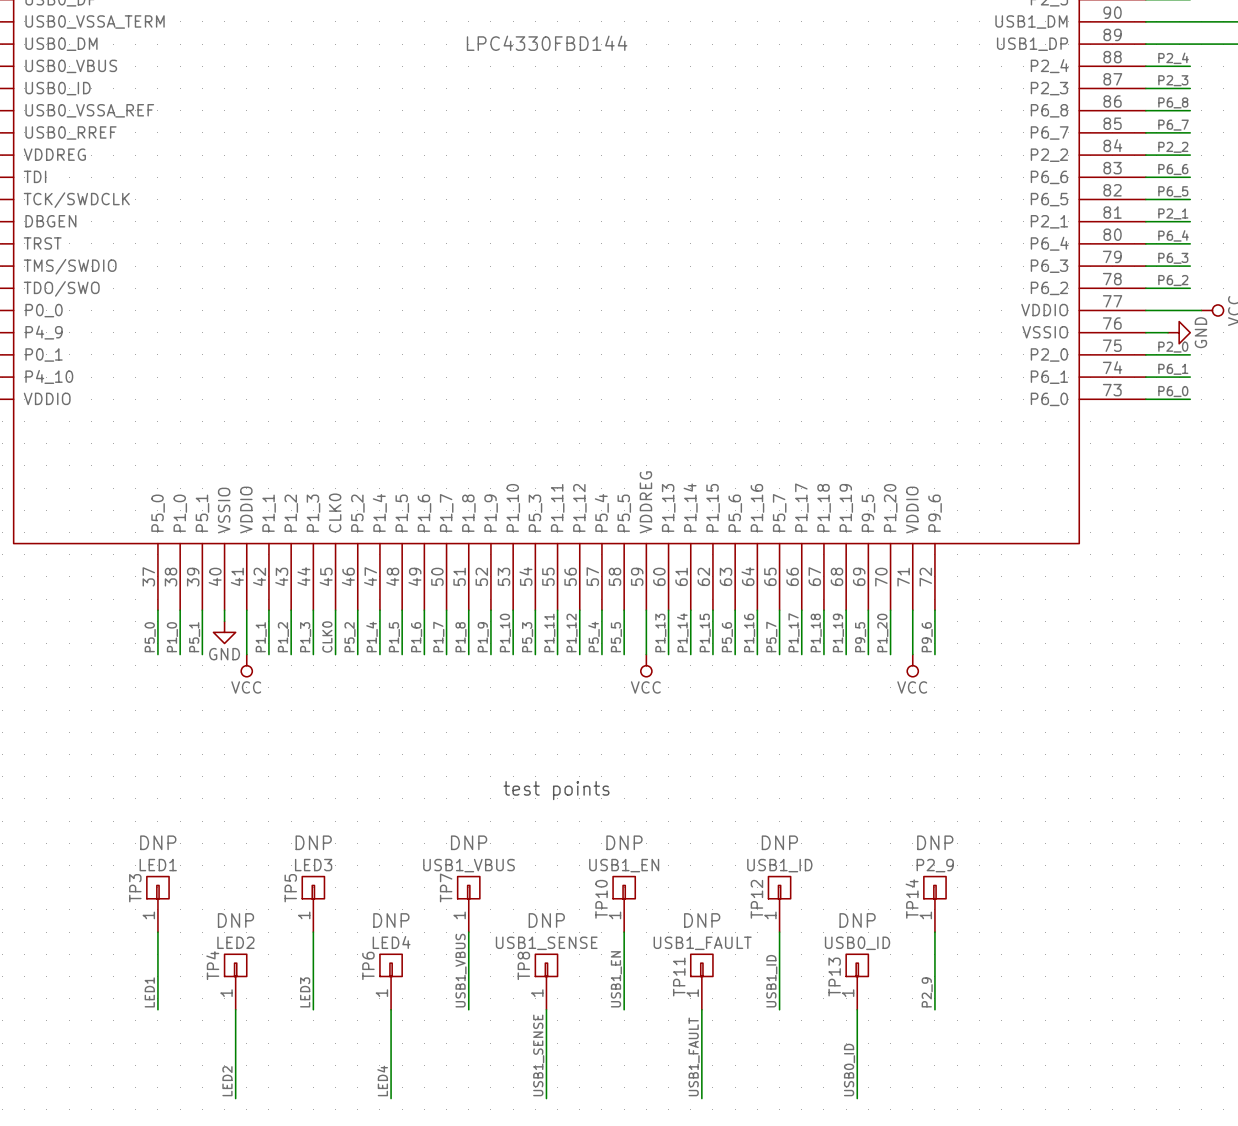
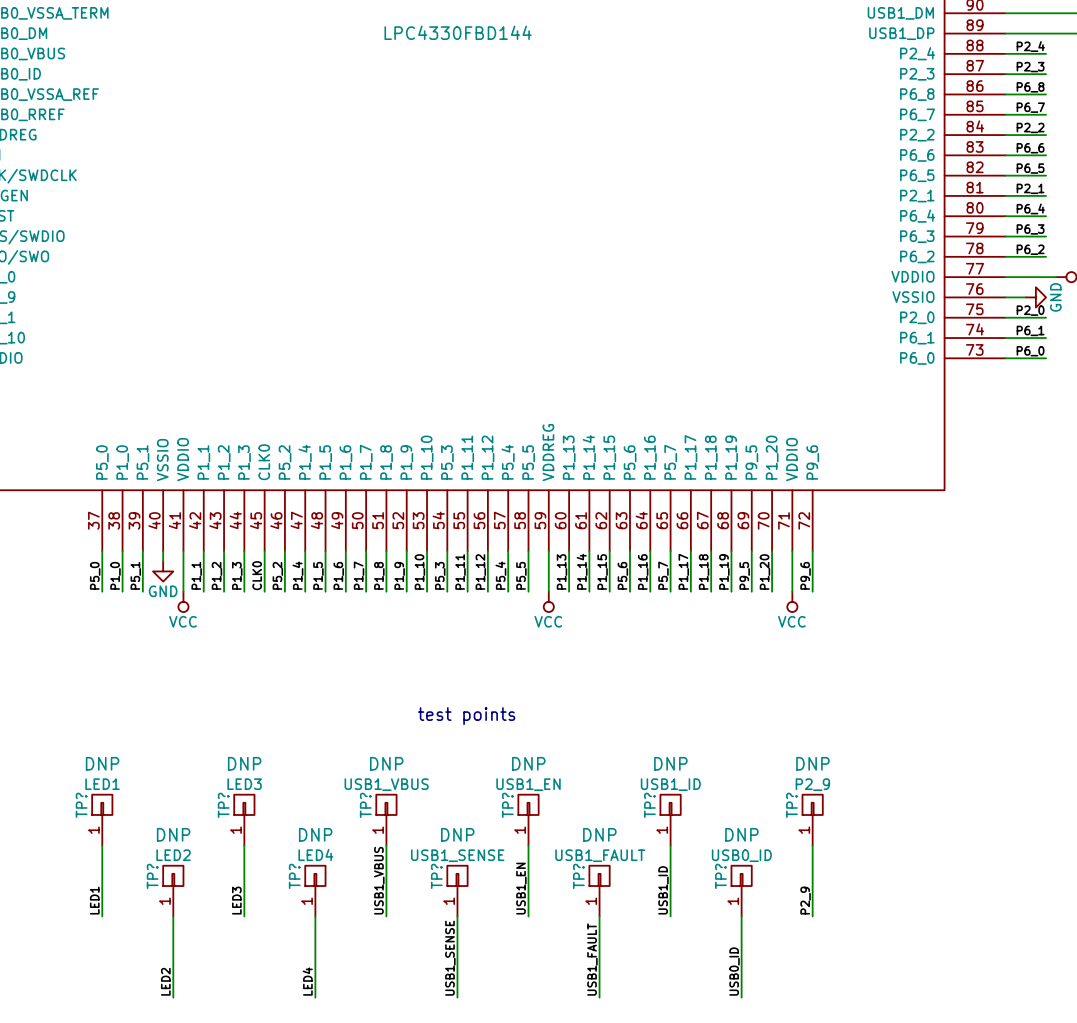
TP7 name: TP7 (446, 887) -> TP? (365, 805)
TP3 name: TP3 (135, 888) -> TP? (81, 805)
TP5 name: TP5 (290, 888) -> TP? (223, 805)
TP10 name: TP10 (601, 899) -> TP? (507, 805)
TP12 name: TP12 (756, 899) -> TP? (649, 805)
TP14 name: TP14 (912, 899) -> TP? (791, 805)
TP4 name: TP4 (212, 965) -> TP? (152, 876)
TP6 name: TP6 (368, 965) -> TP? (294, 876)
TP8 name: TP8 (523, 965) -> TP? (436, 876)
TP11 name: TP11 (679, 977) -> TP? (578, 876)
TP13 name: TP13 (834, 977) -> TP? (720, 876)

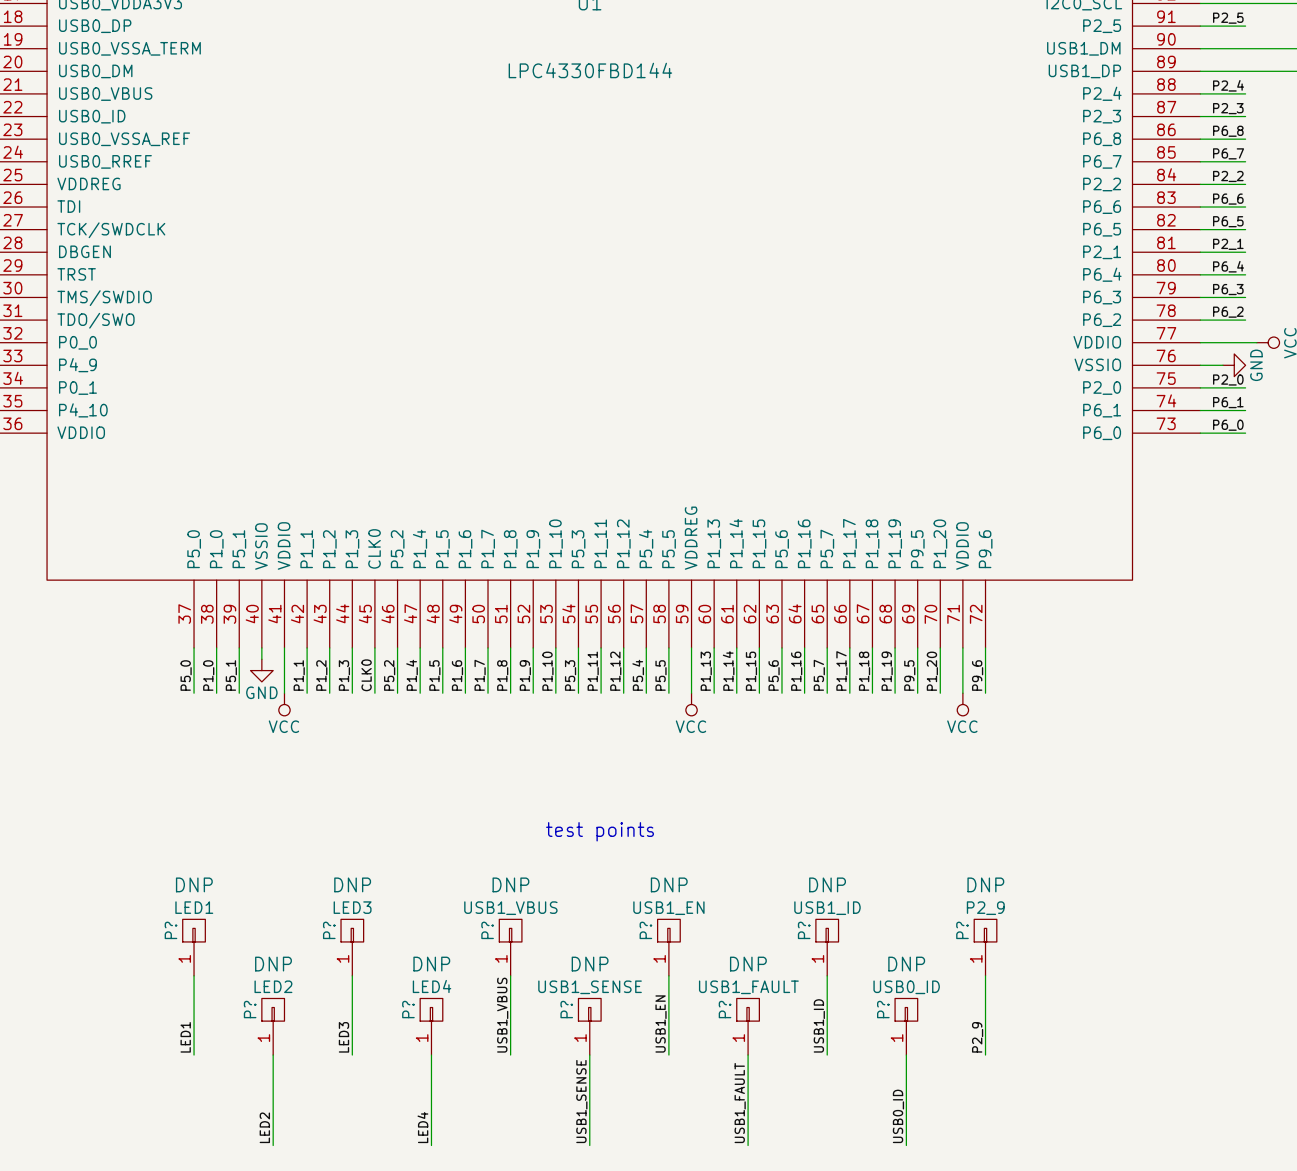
TP? name: TP? (81, 805) -> P? (170, 930)
TP? name: TP? (223, 805) -> P? (329, 930)
TP? name: TP? (365, 805) -> P? (487, 930)
TP? name: TP? (507, 805) -> P? (645, 930)
TP? name: TP? (649, 805) -> P? (804, 930)
TP? name: TP? (791, 805) -> P? (962, 930)
TP? name: TP? (152, 876) -> P? (250, 1009)
TP? name: TP? (294, 876) -> P? (408, 1009)
TP? name: TP? (436, 876) -> P? (566, 1009)
TP? name: TP? (578, 876) -> P? (725, 1009)
TP? name: TP? (720, 876) -> P? (883, 1009)

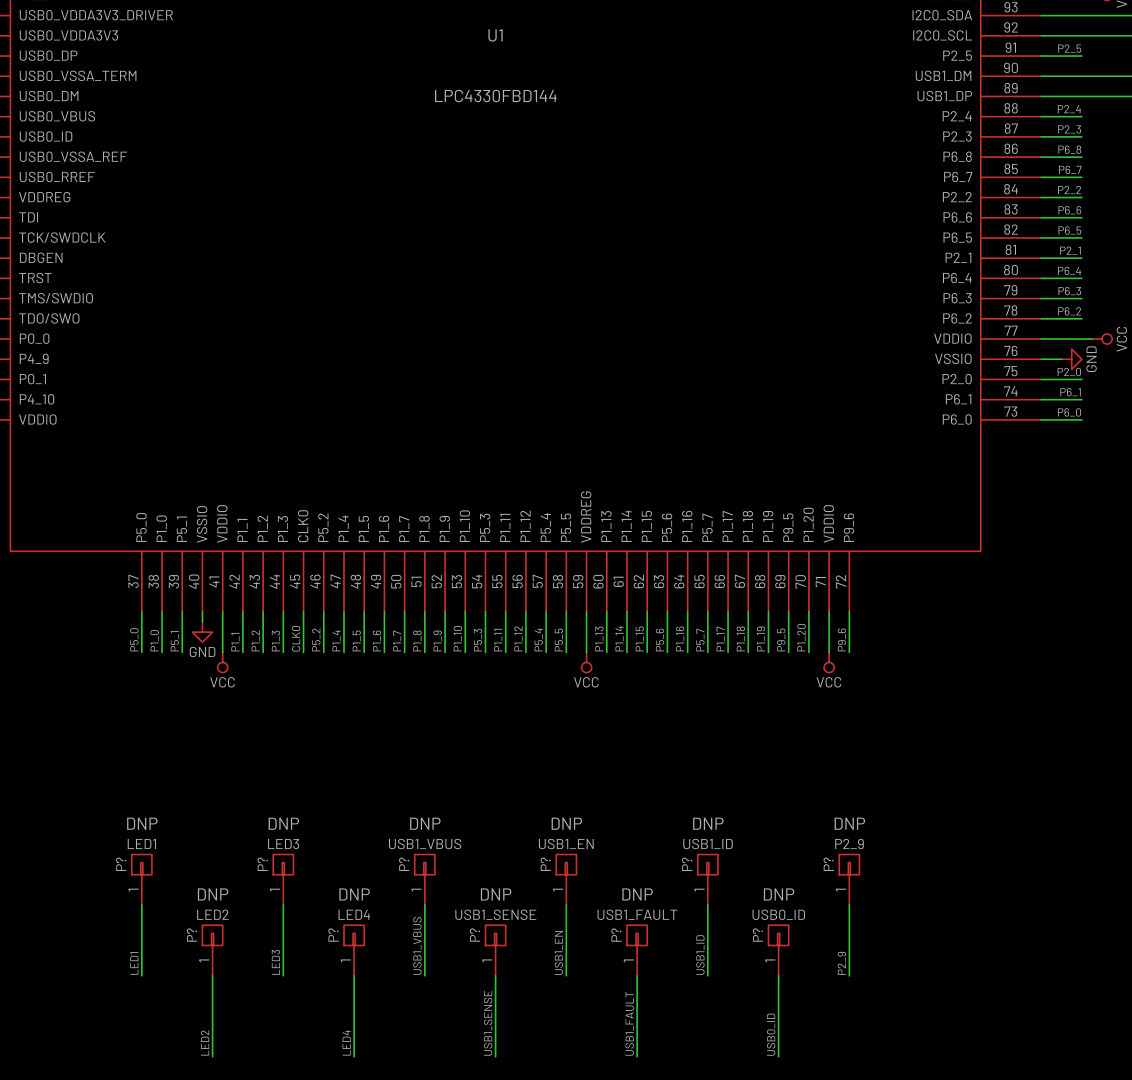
text: test points (600, 831) -> none

